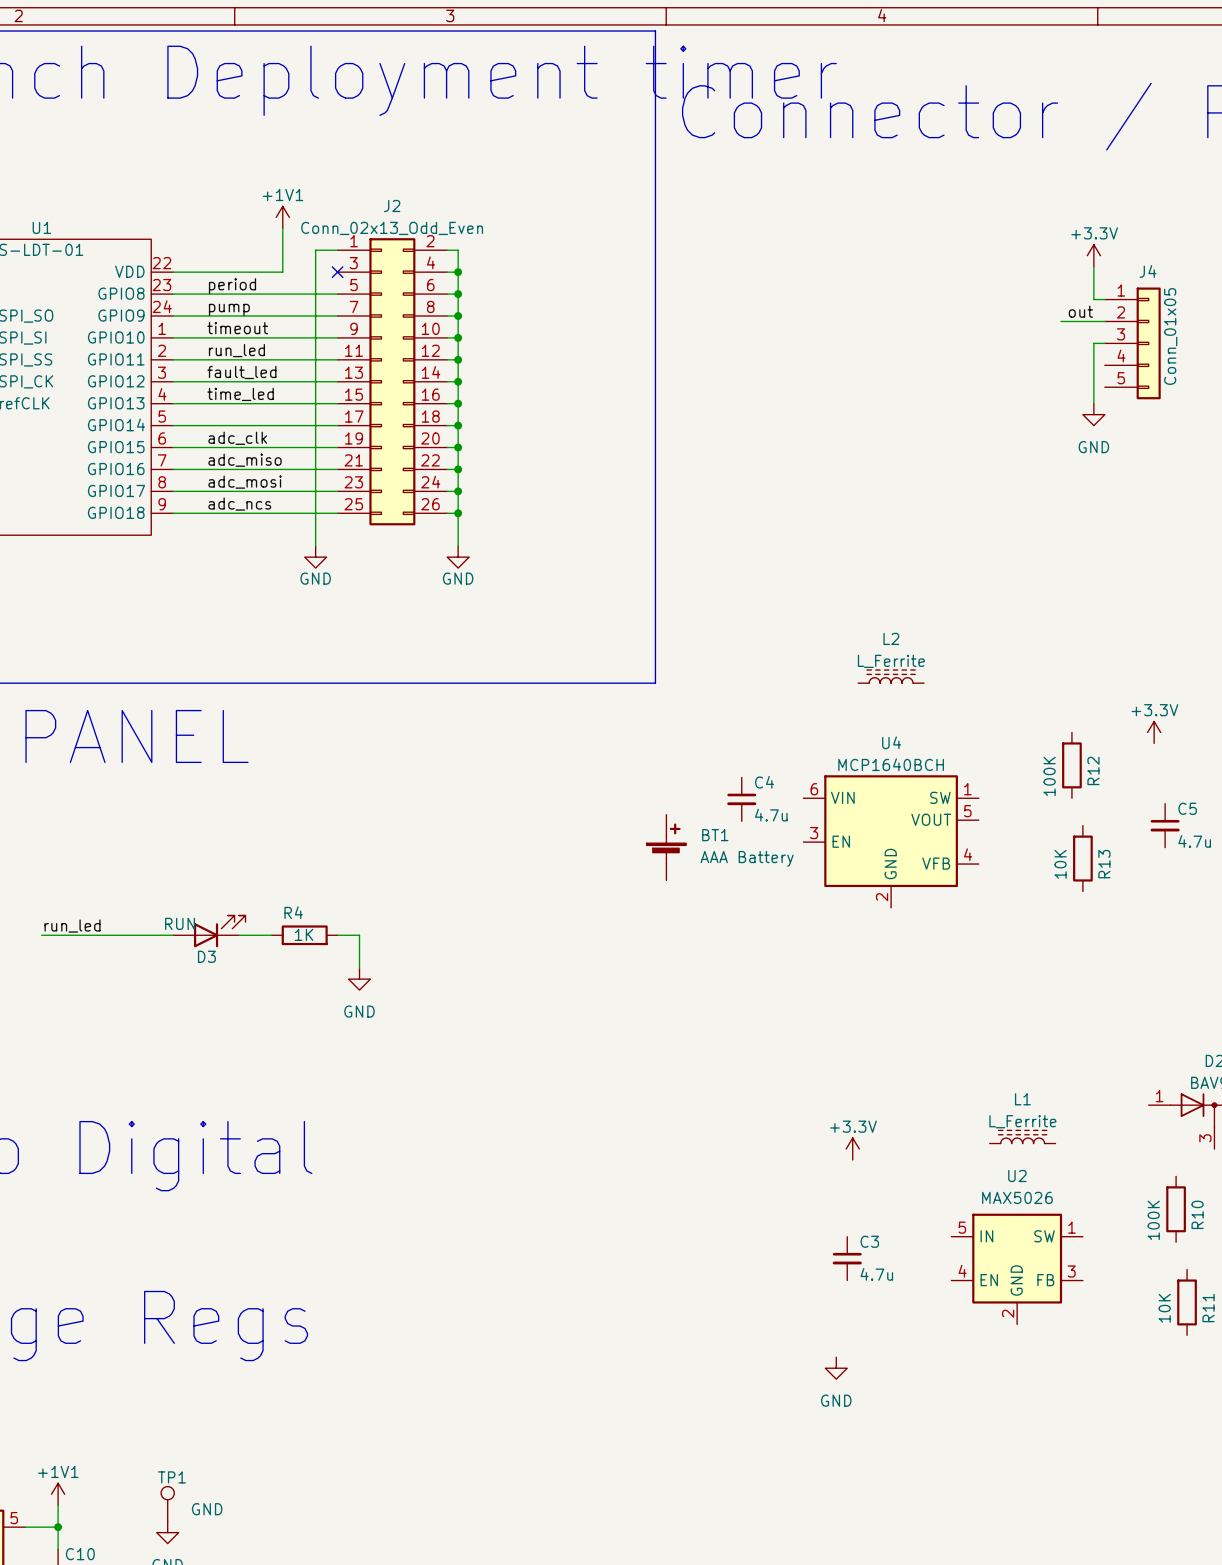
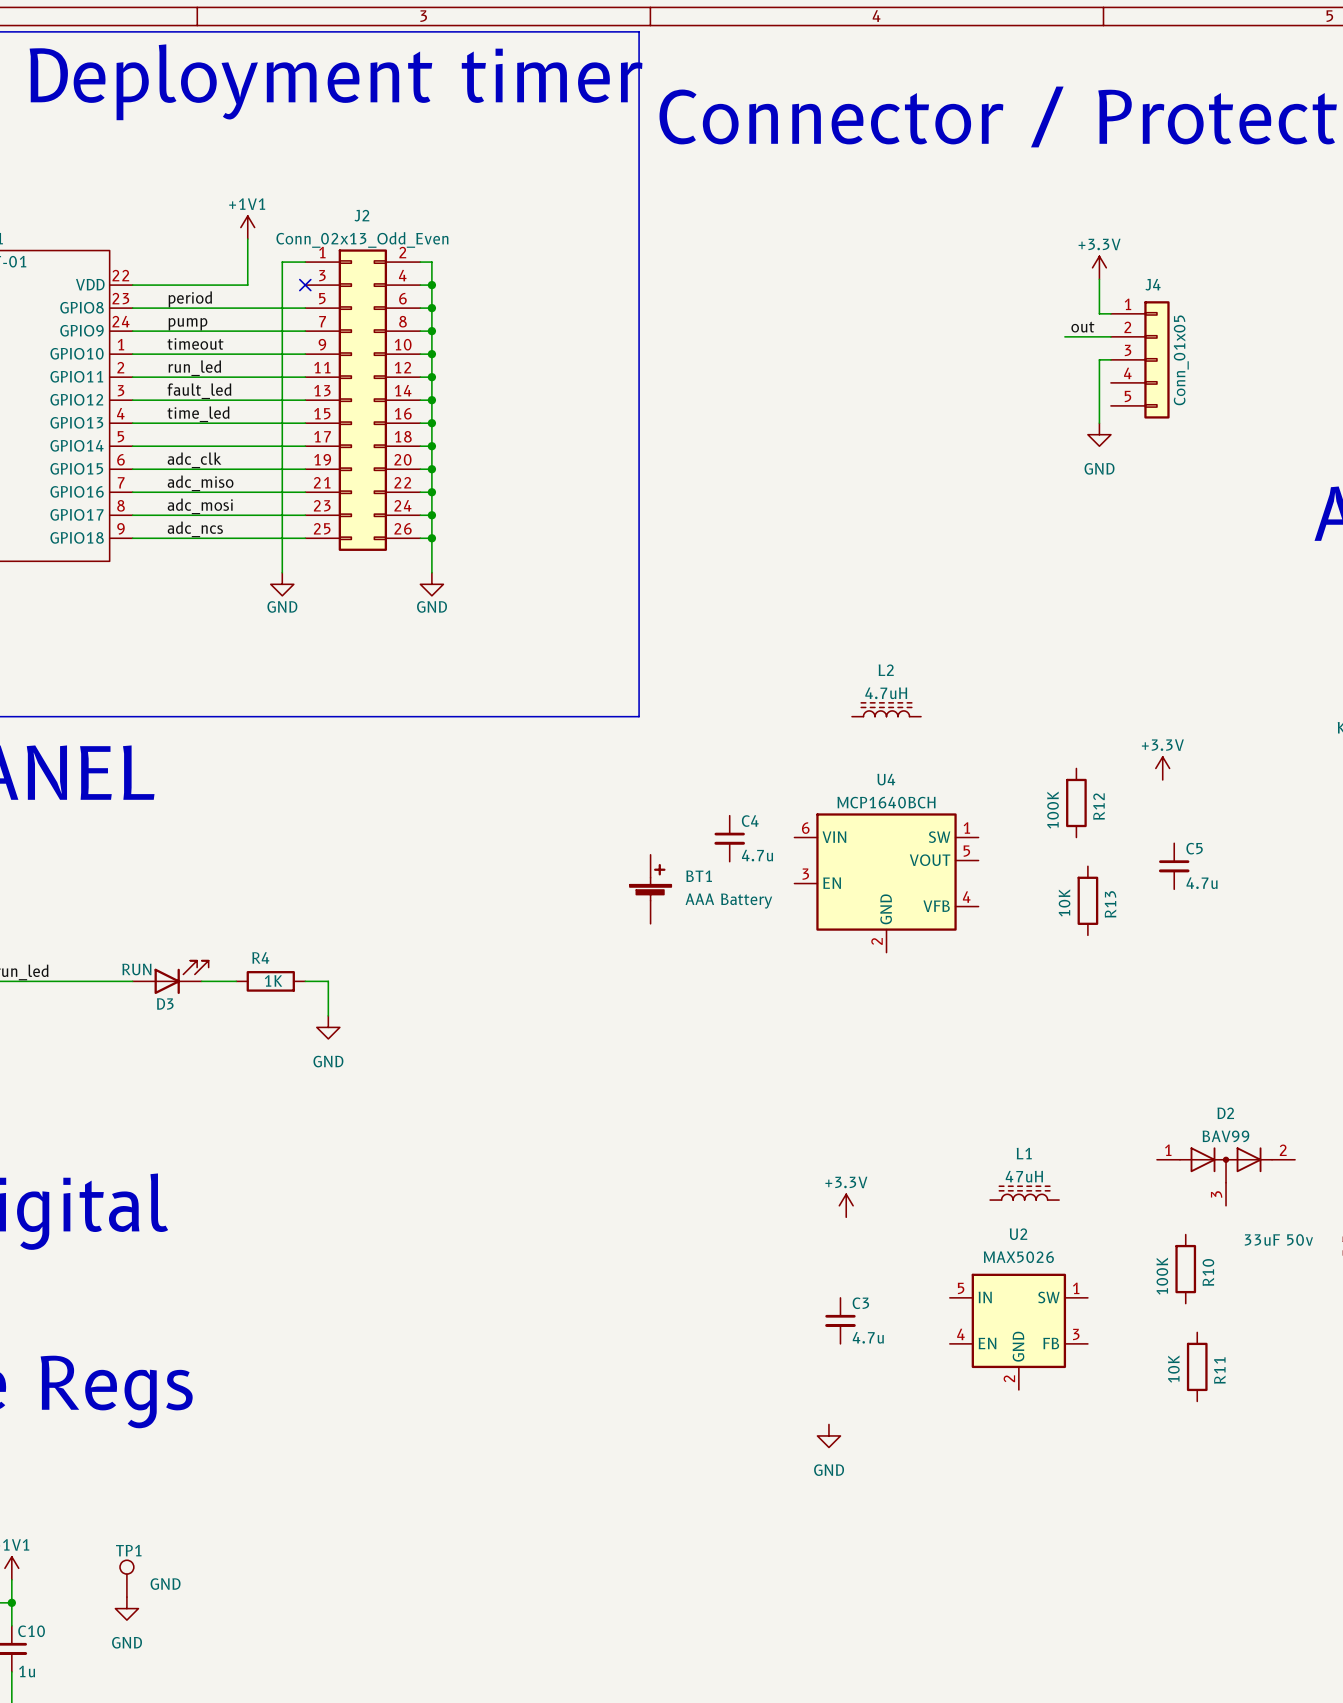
L2 value: L_Ferrite (891, 661) -> 4.7uH (886, 693)
L1 value: L_Ferrite (1022, 1121) -> 47uH (1024, 1176)

